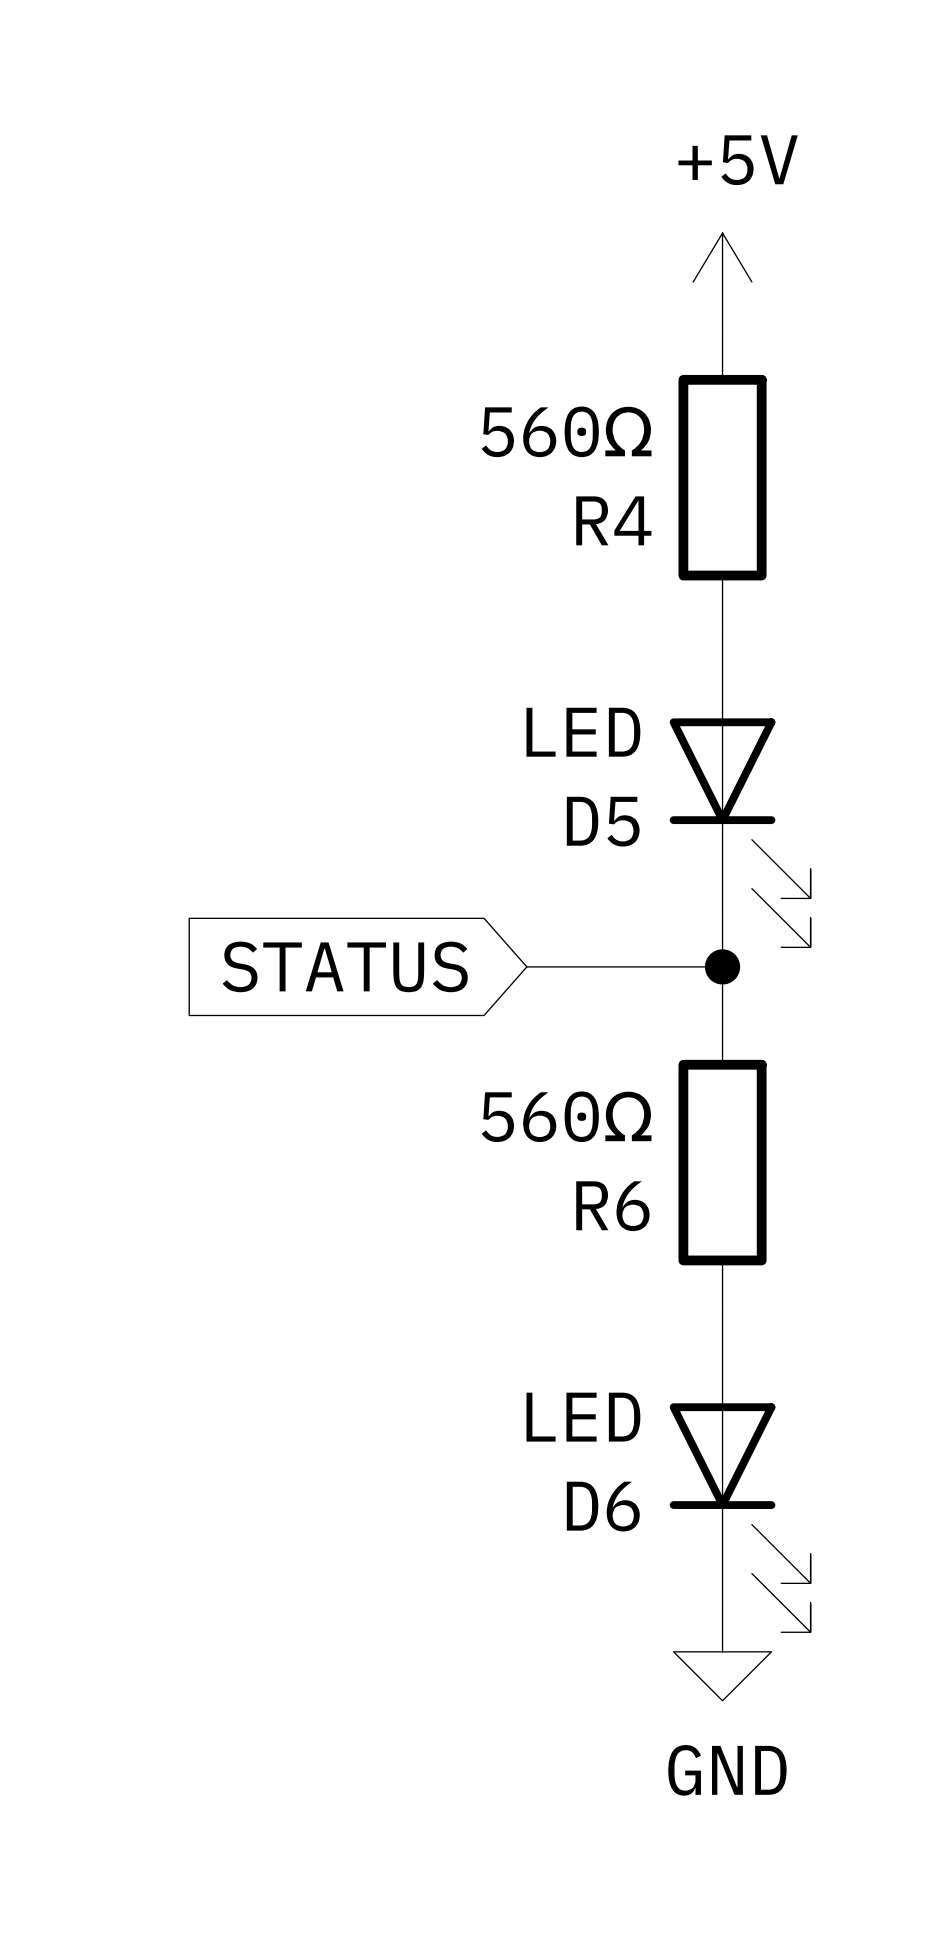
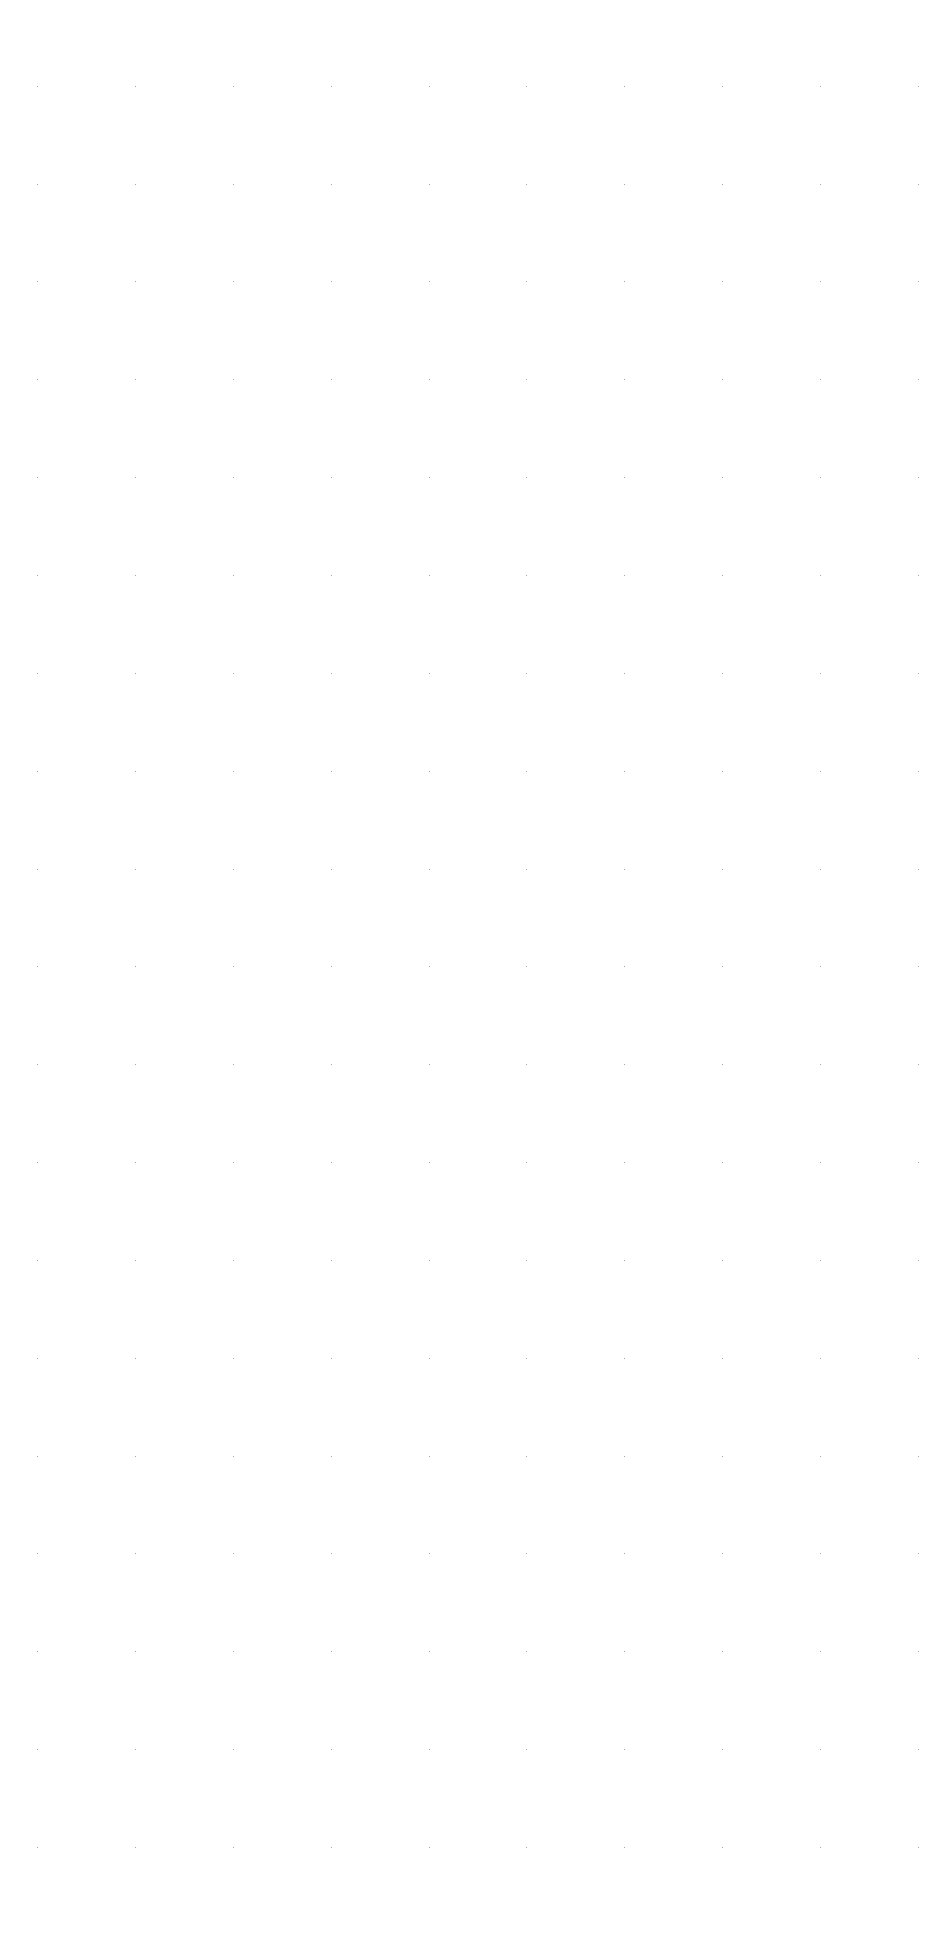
power symbol: +5V (722, 281) -> none
R4: 560Ω (722, 477) -> none
D5: LED (740, 785) -> none
wire: (722, 917) (722, 1015) -> none
global label: STATUS (345, 966) -> none
wire: (526, 966) (722, 966) -> none
junction: (722, 966) -> none
R6: 560Ω (722, 1162) -> none
D6: LED (740, 1470) -> none
power symbol: GND (722, 1651) -> none

